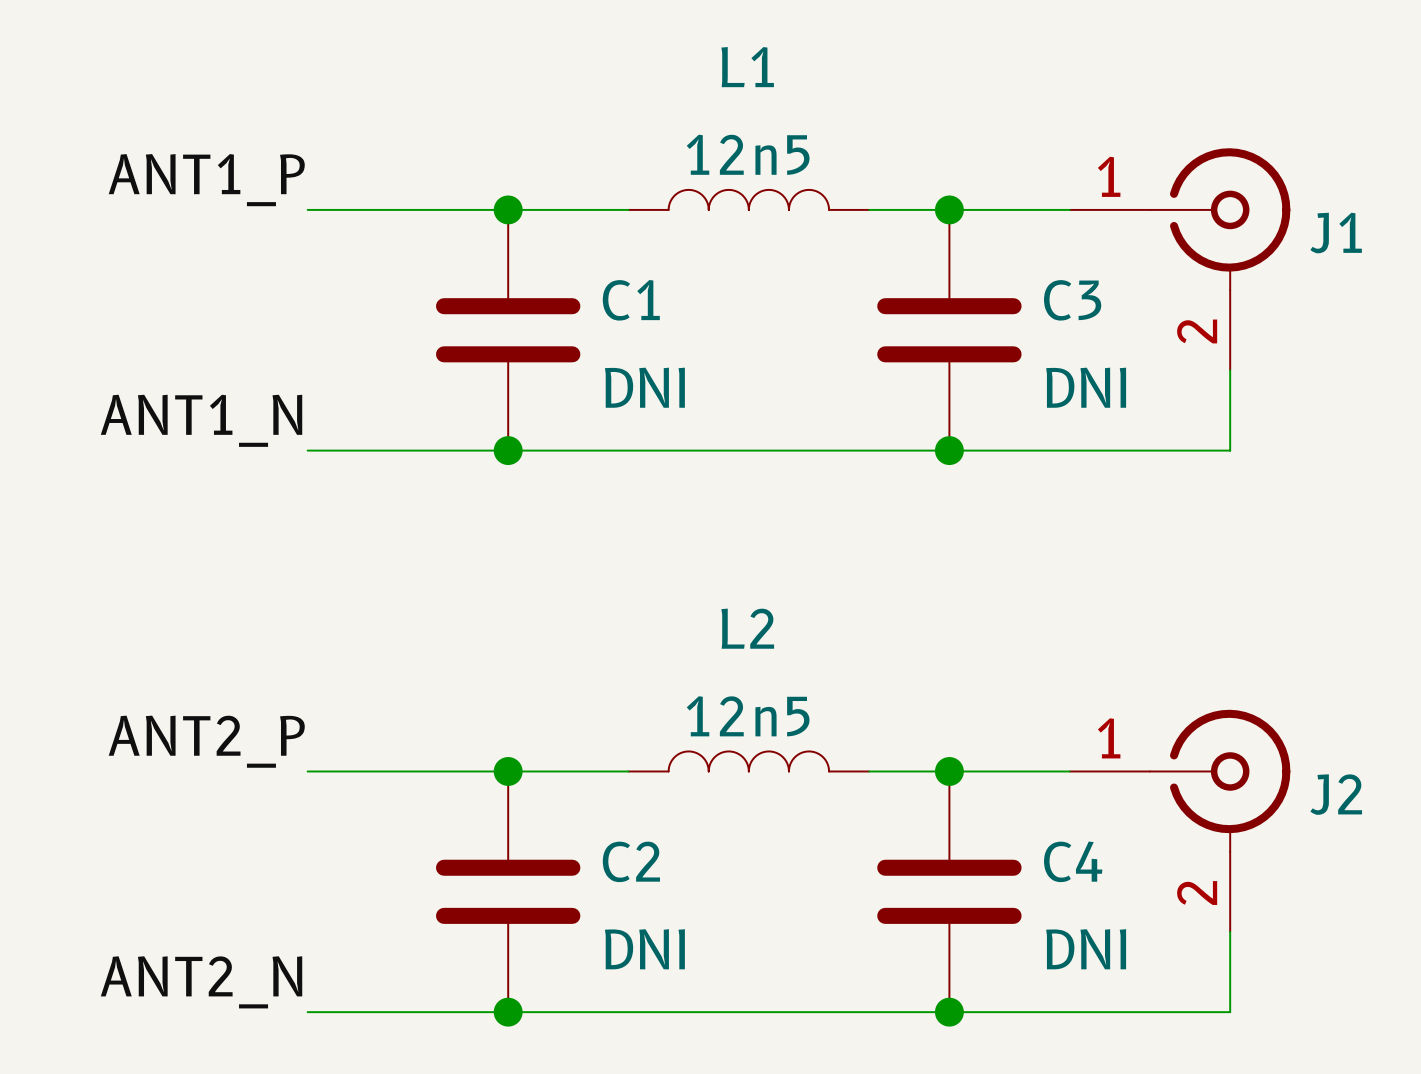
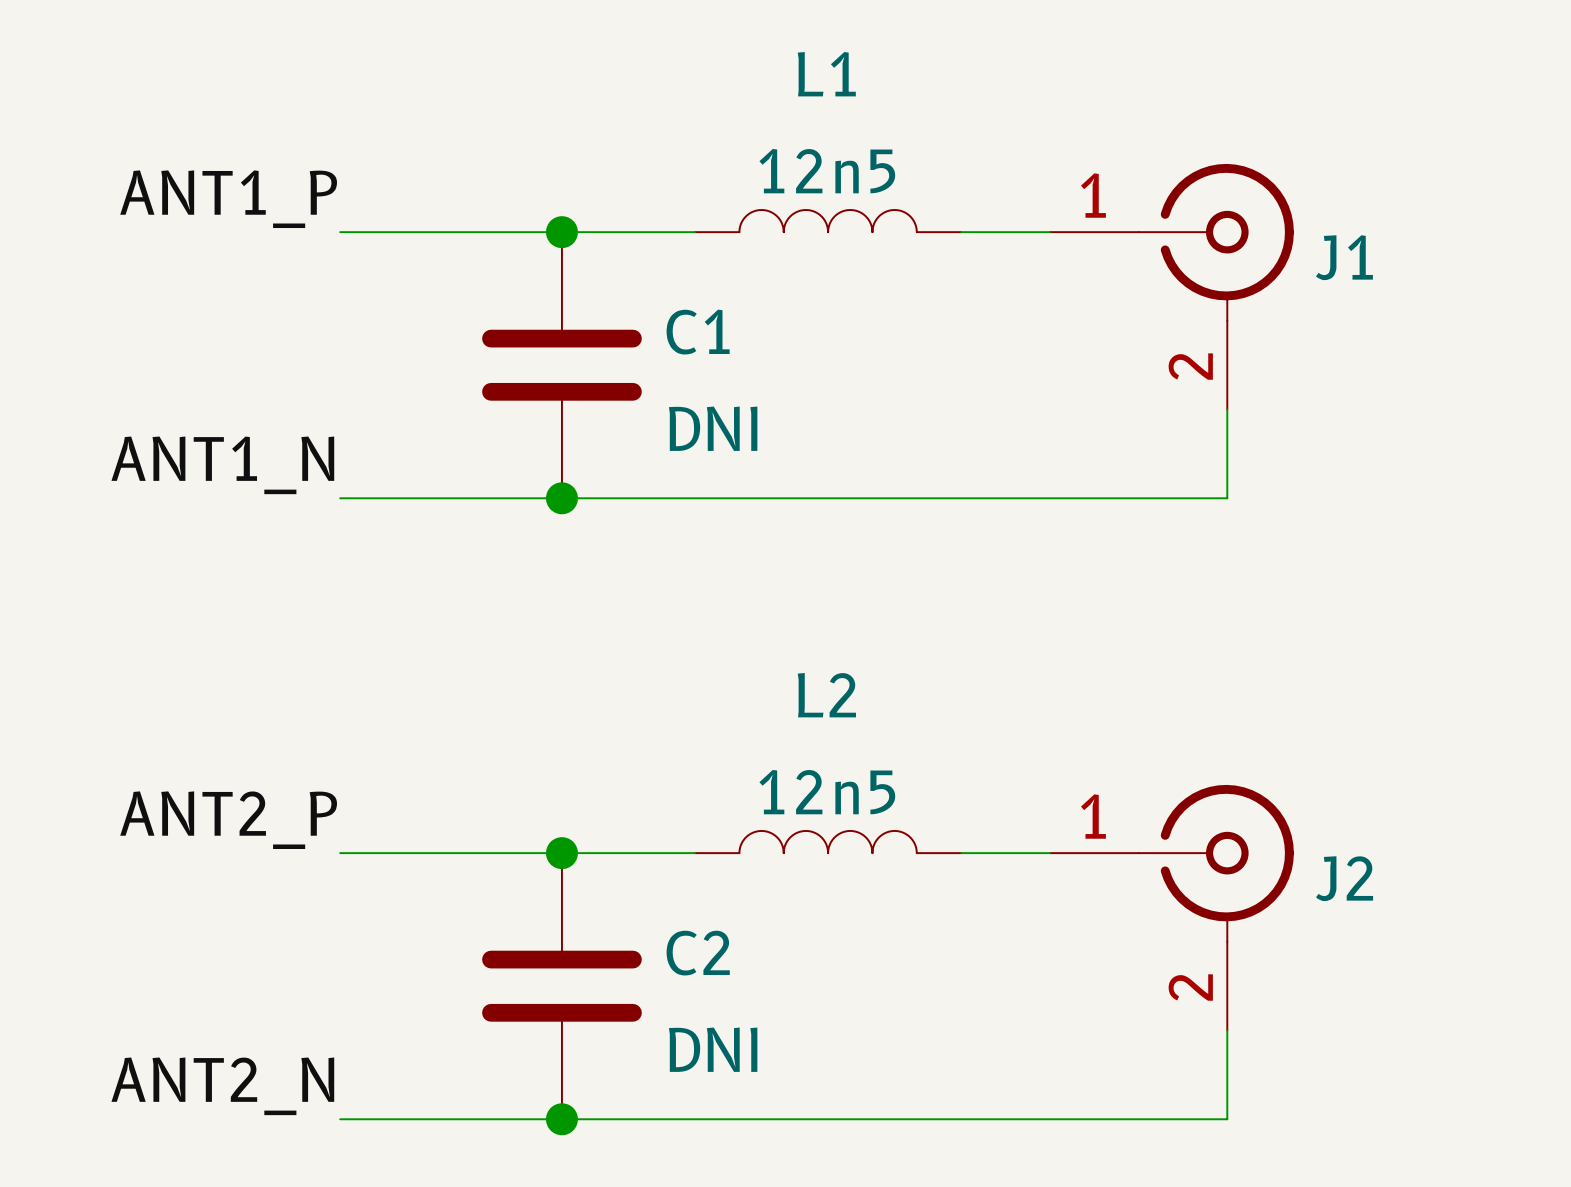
junction: (949, 209) -> none
J1 position: (1180, 259) -> (1171, 286)
C3: DNI (949, 330) -> none
wire: (1230, 370) (1230, 450) (1109, 450) -> (1227, 409) (1227, 498)
junction: (949, 450) -> none
junction: (949, 771) -> none
J2 position: (1180, 820) -> (1171, 907)
C4: DNI (949, 891) -> none
wire: (1230, 931) (1230, 1012) (1109, 1012) -> (1227, 1030) (1227, 1119)
junction: (949, 1012) -> none

